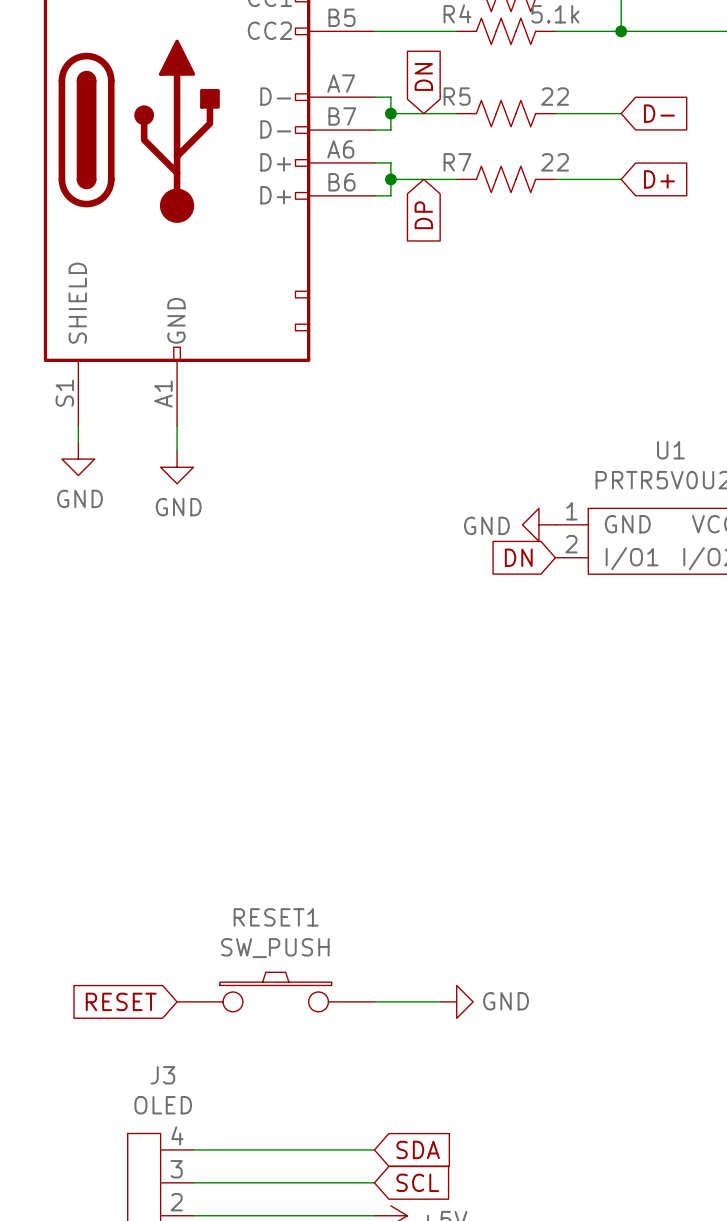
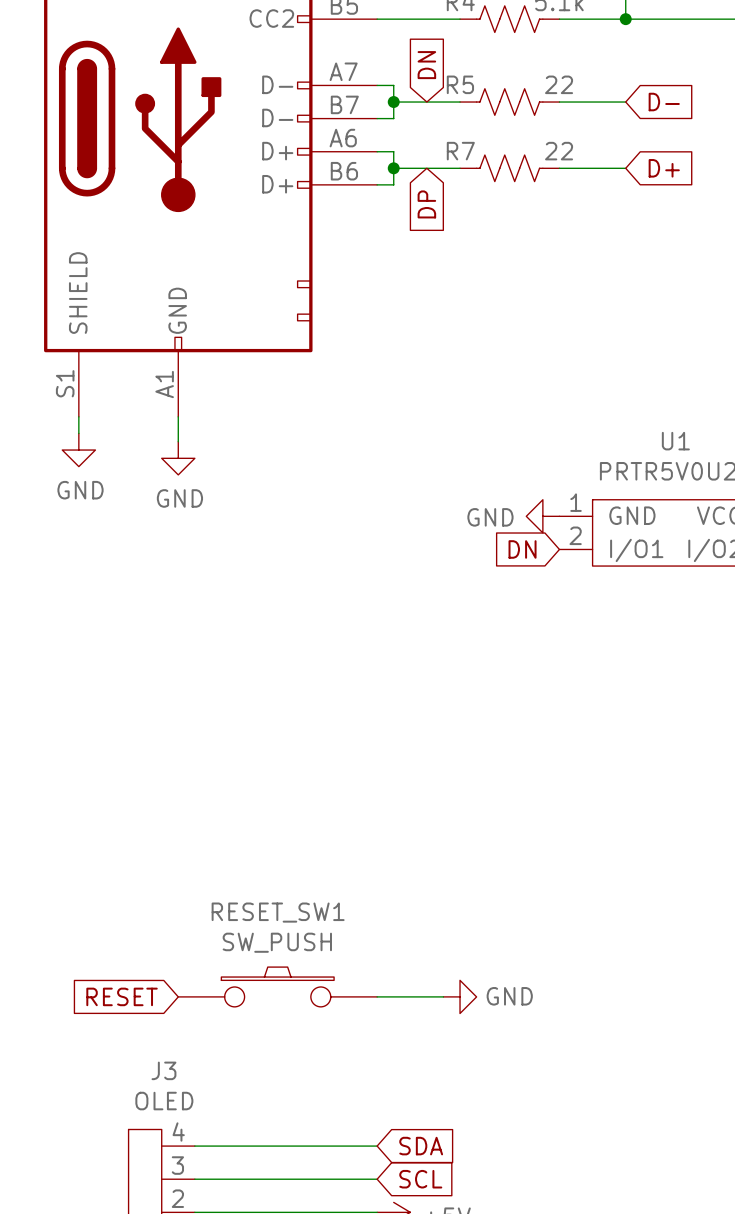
RESET1 name: RESET1 (276, 917) -> RESET_SW1 (278, 912)

